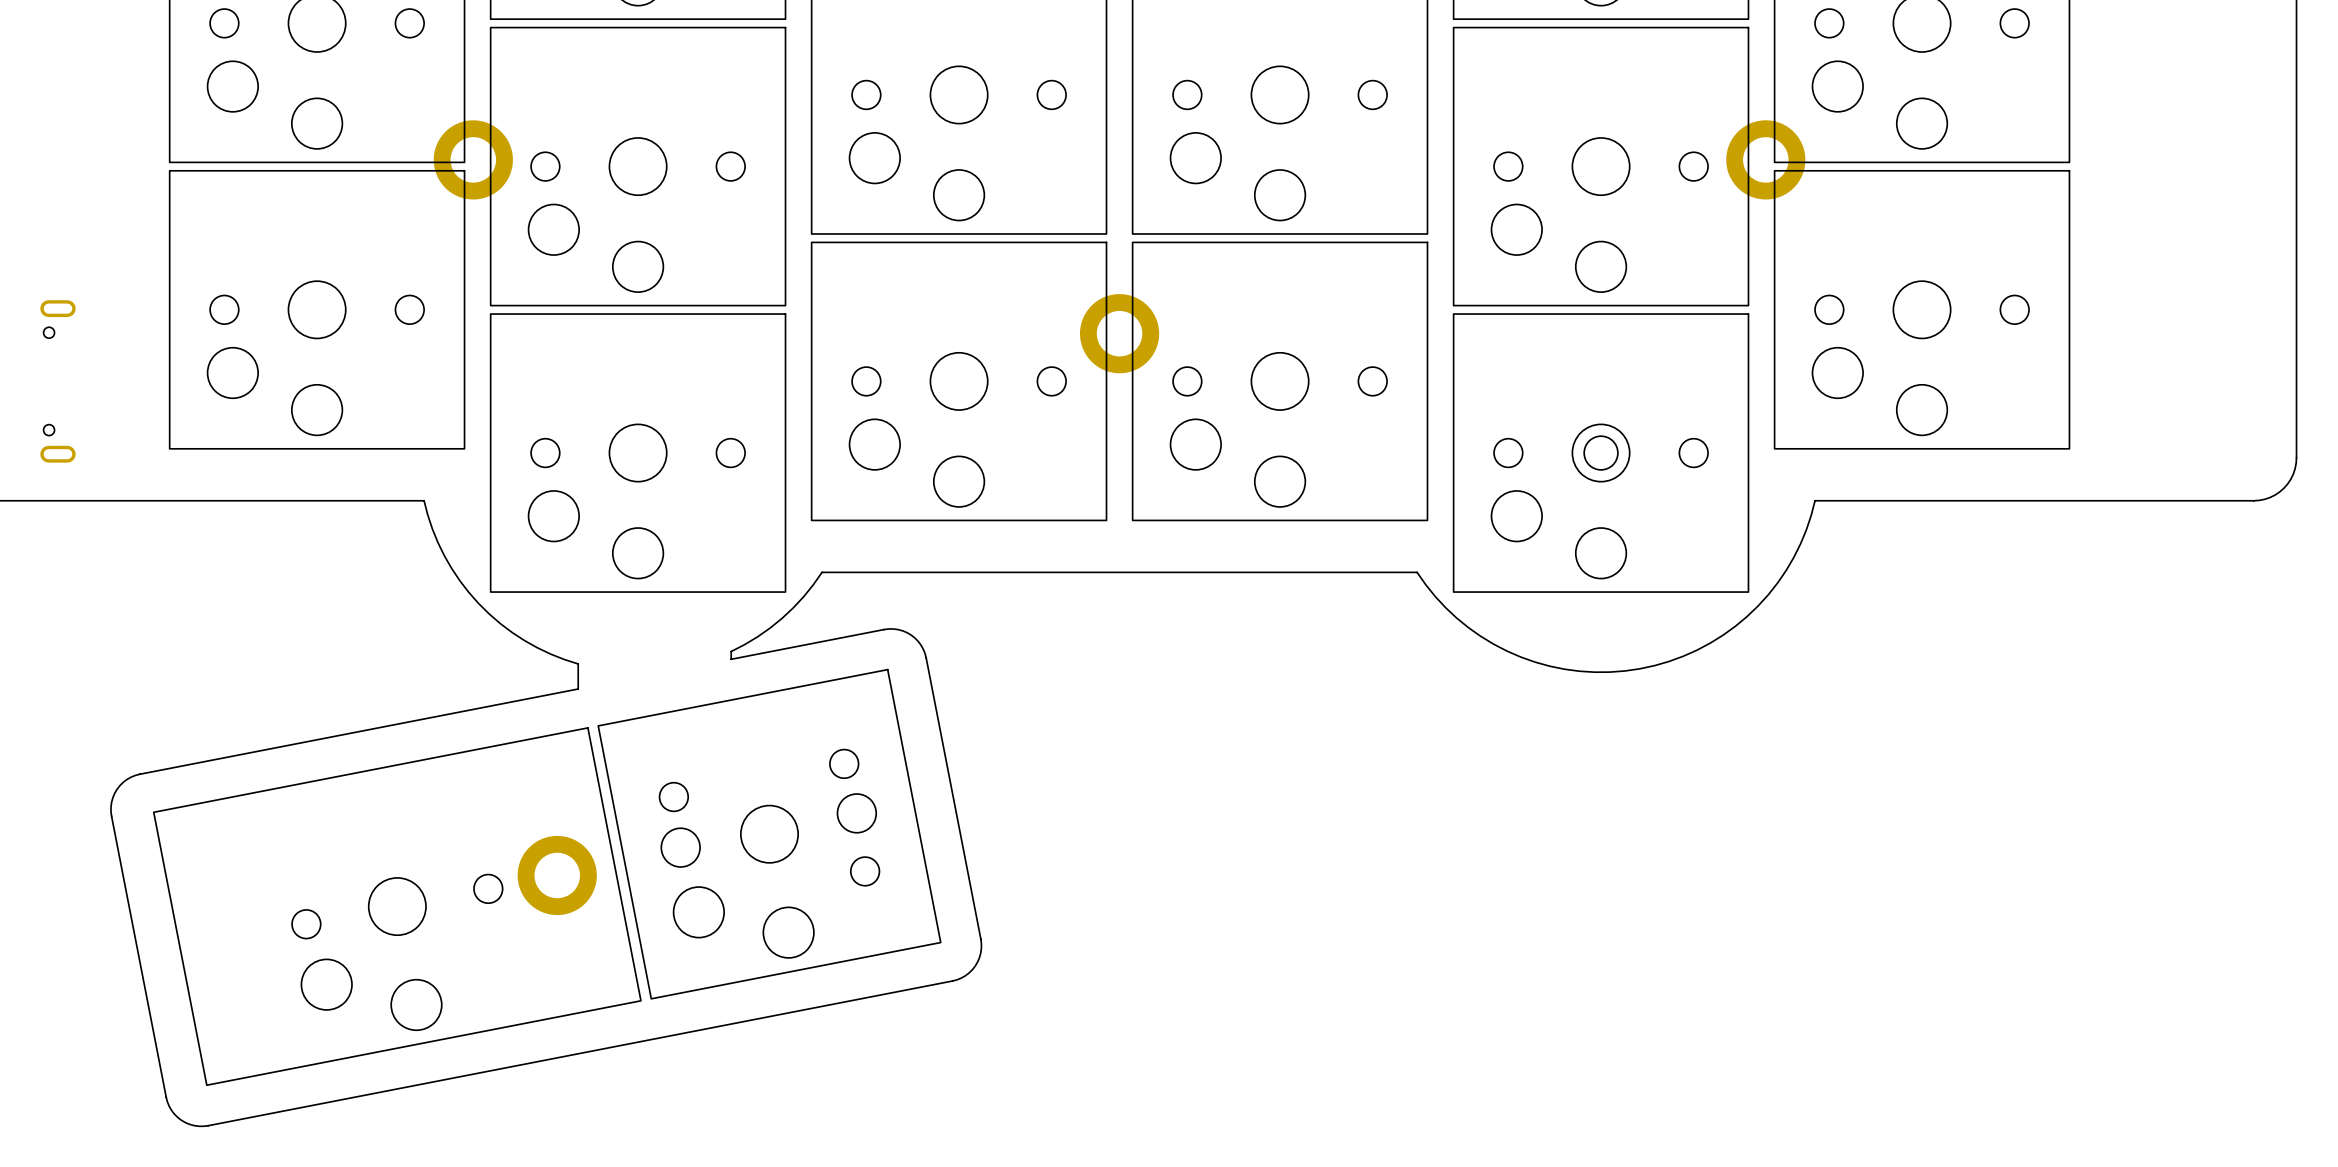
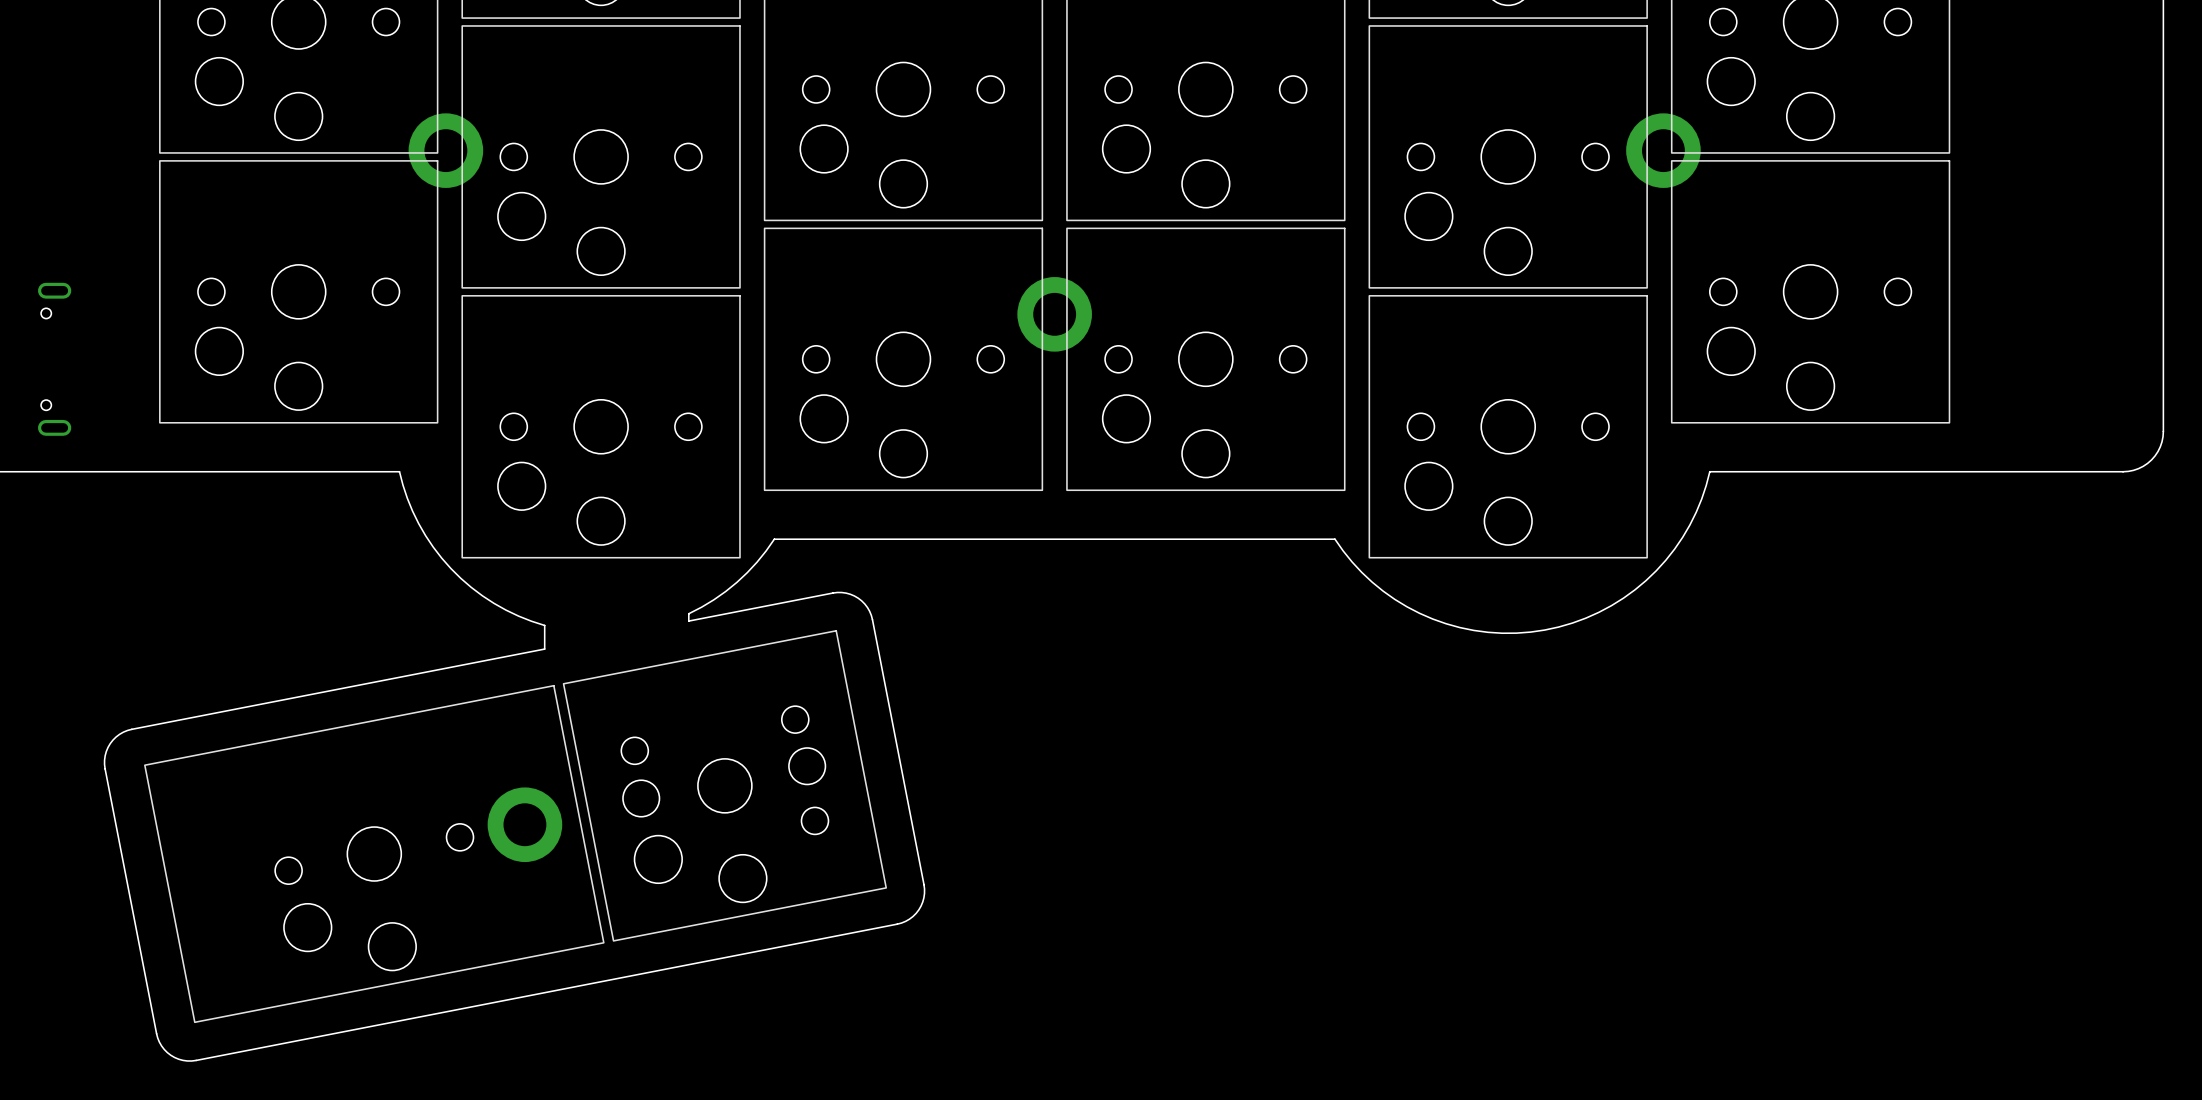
round board edge: [1583, 435, 1619, 471] -> none

